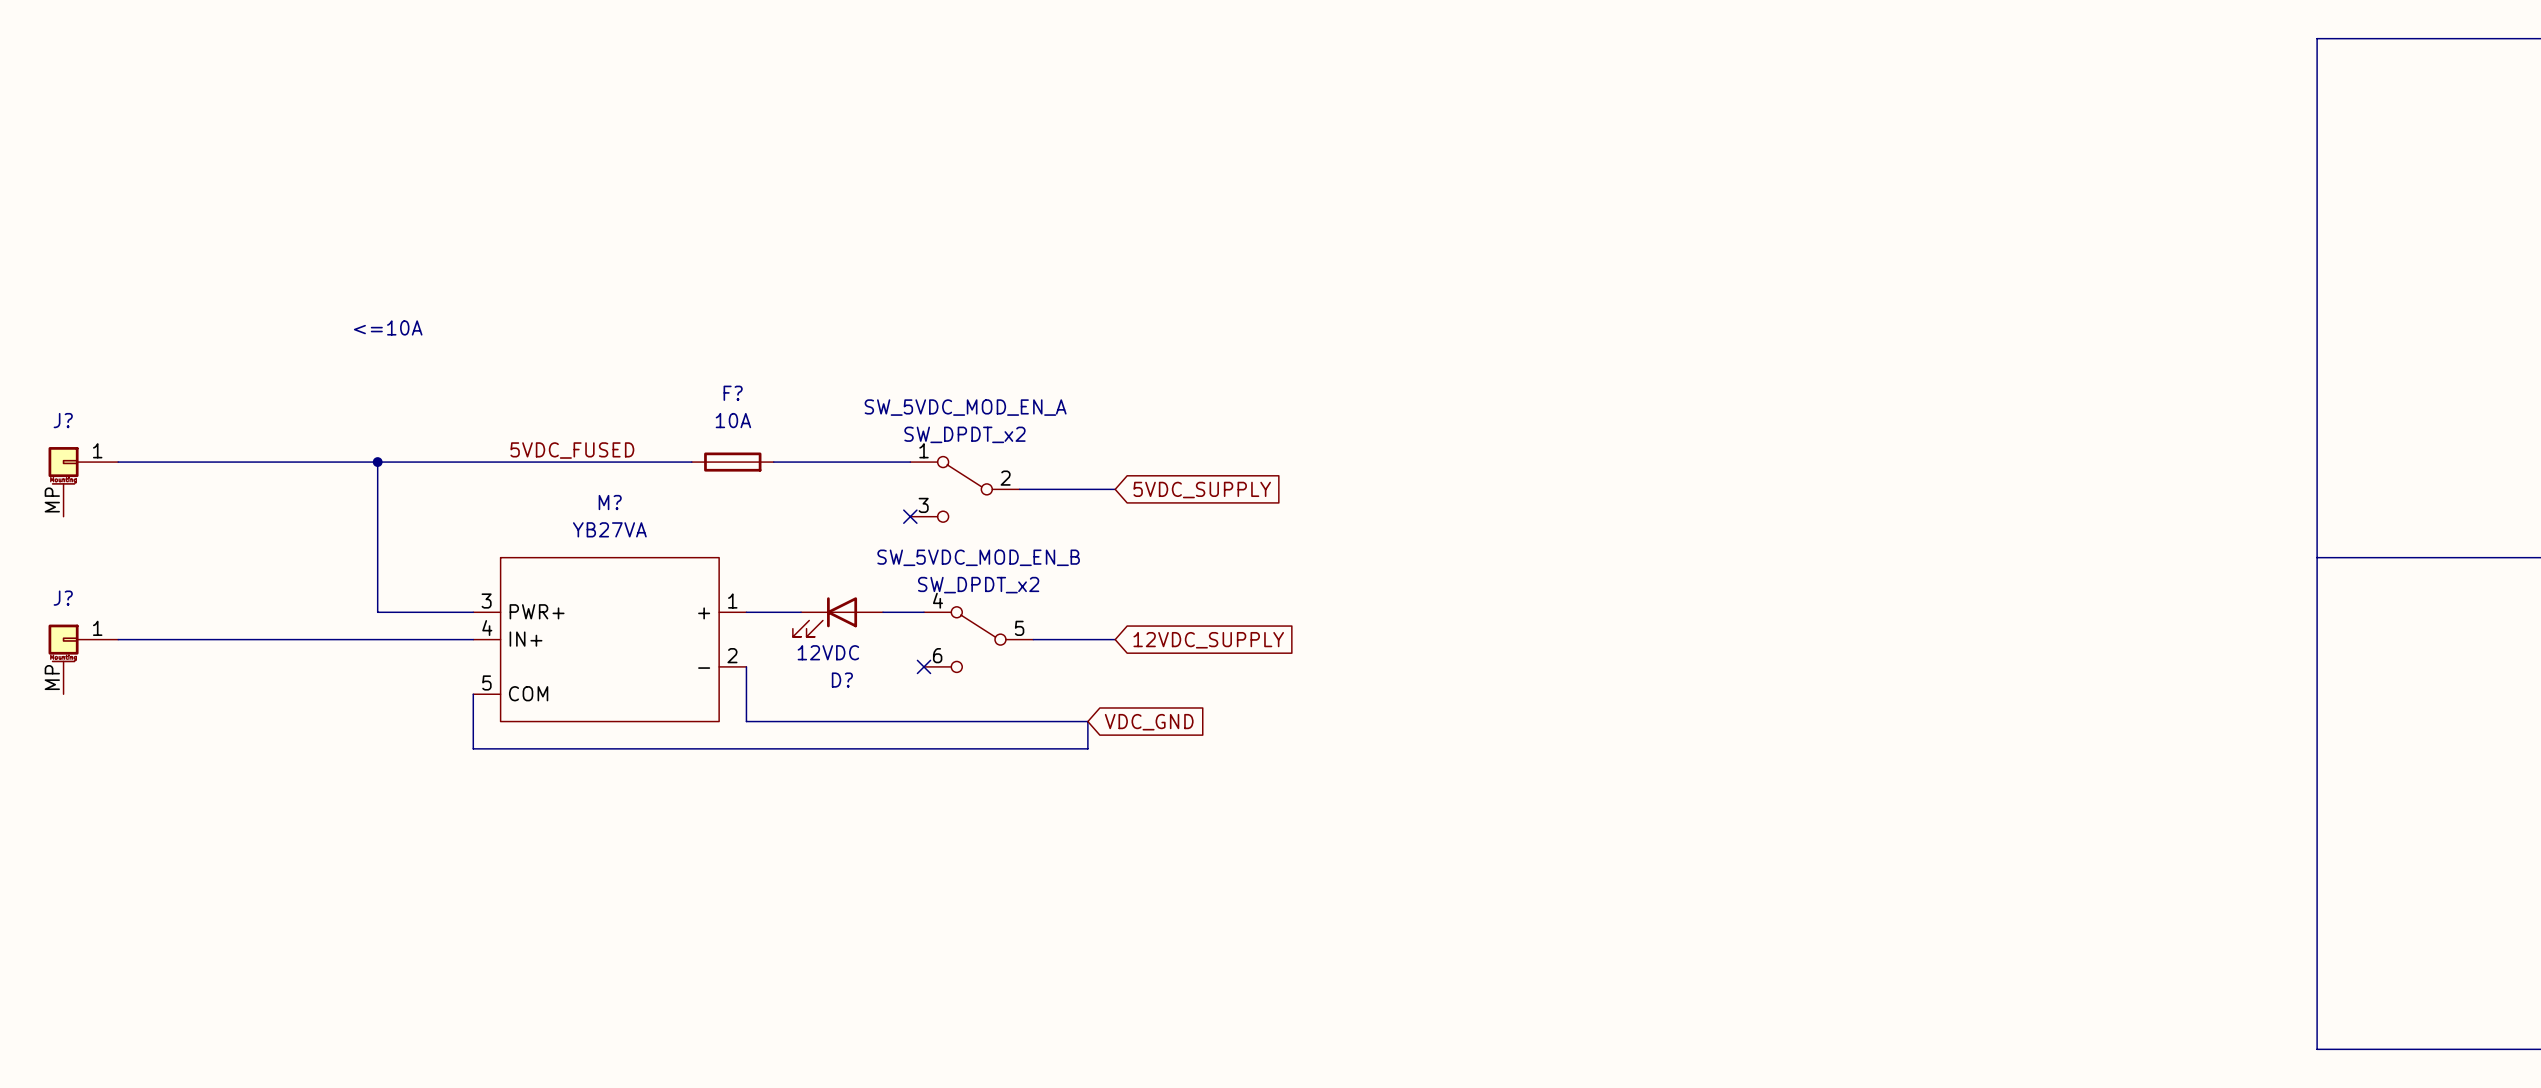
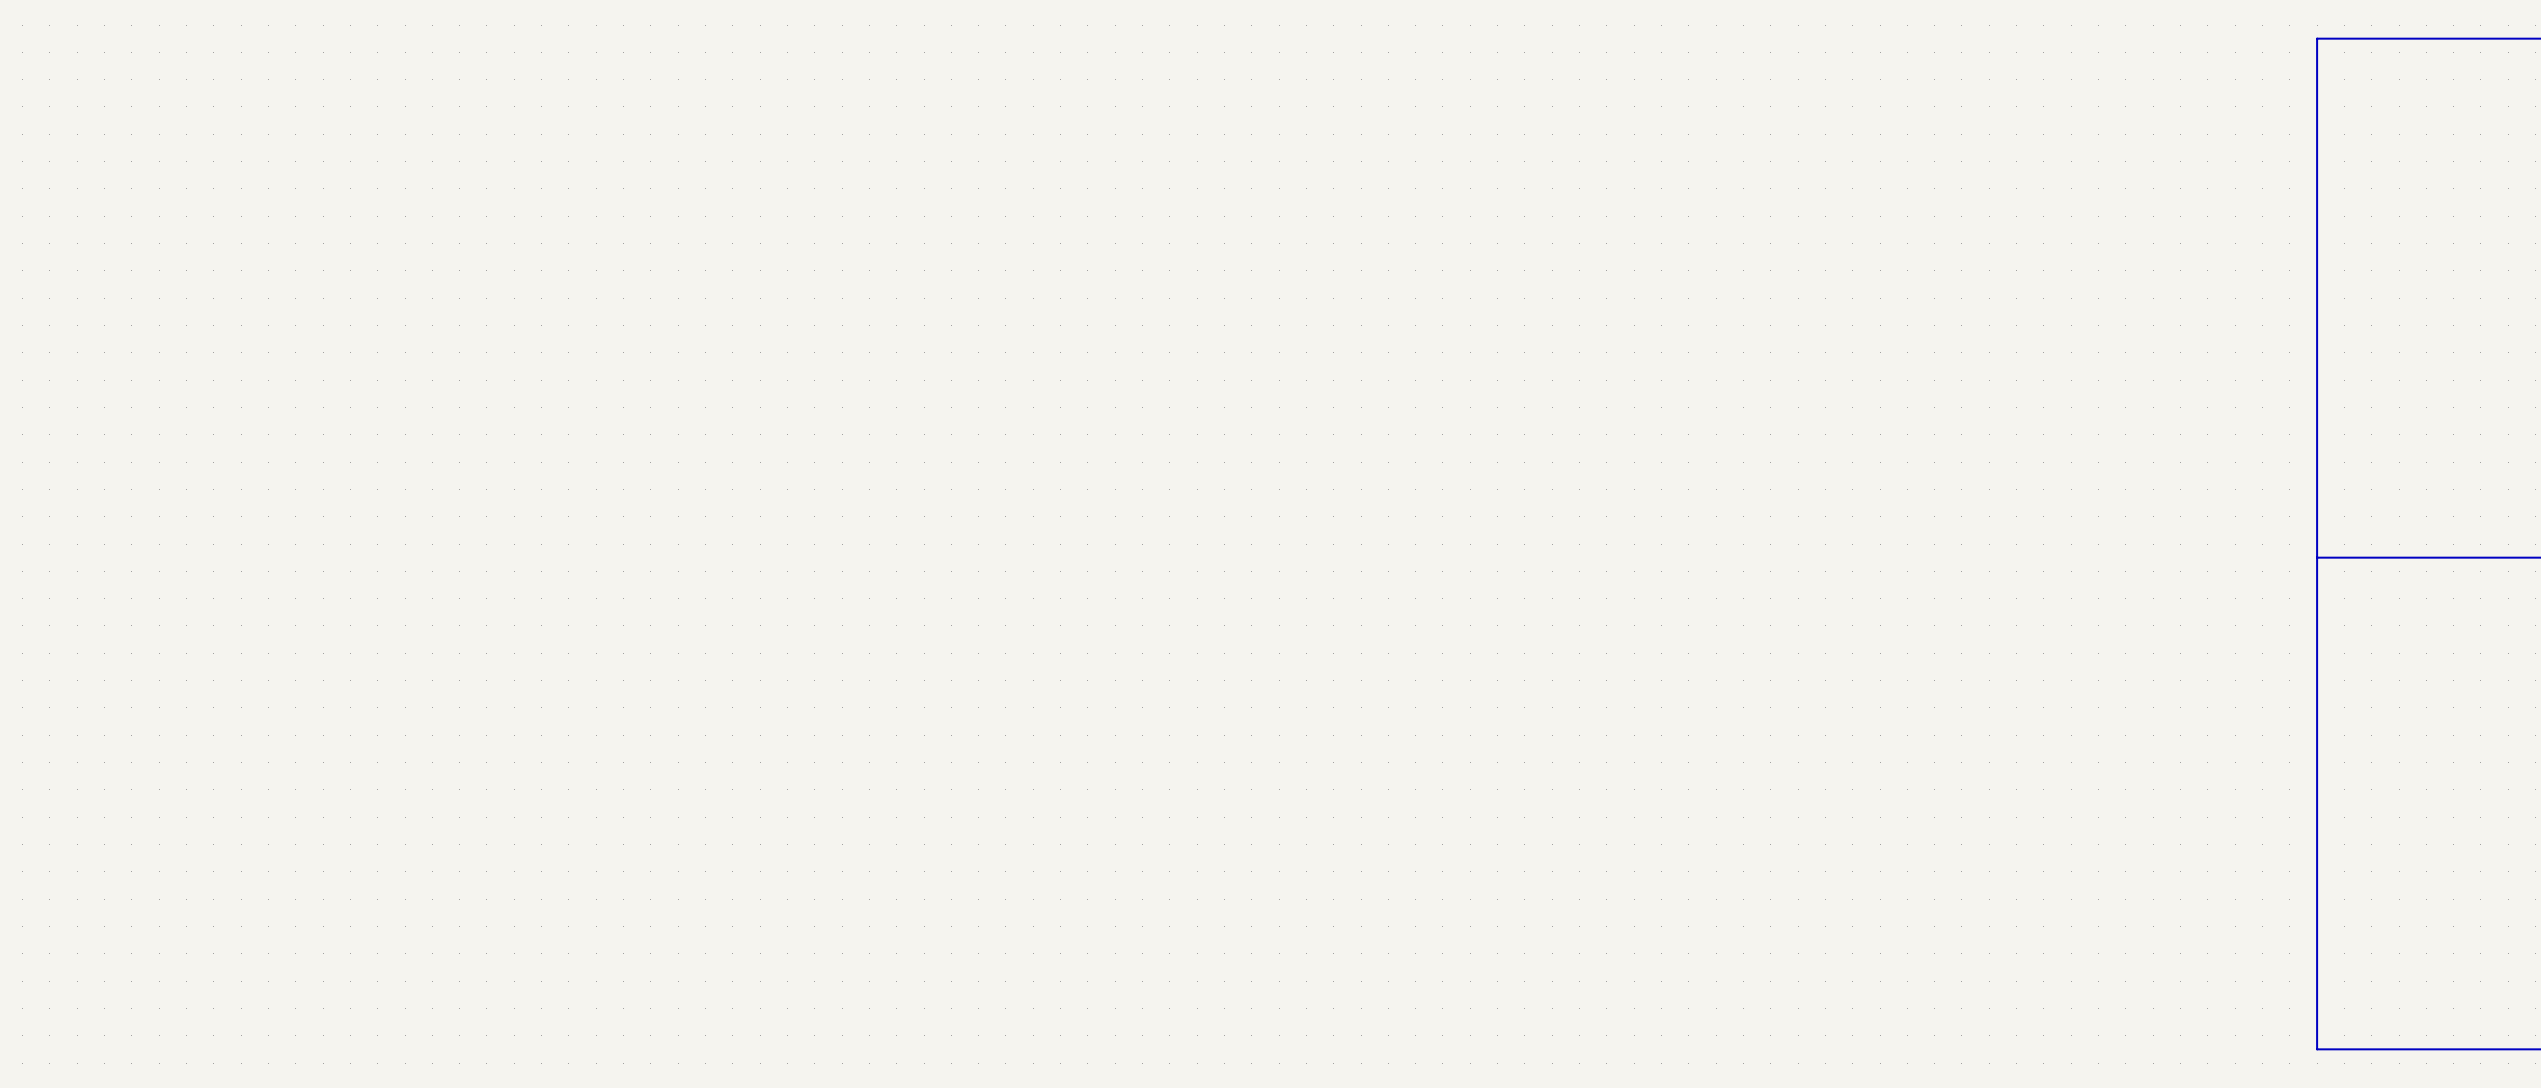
text: <=10A (388, 327) -> none
label: 5VDC_FUSED (572, 450) -> none
wire: (118, 462) (691, 462) -> none
wire: (377, 462) (377, 612) (473, 612) -> none
junction: (377, 462) -> none
F?: 10A (732, 462) -> none
wire: (773, 462) (910, 462) -> none
J?: (83, 481) -> none
SW_5VDC_MOD_EN_A: SW_DPDT_x2 (964, 489) -> none
wire: (1019, 489) (1115, 489) -> none
global label: 5VDC_SUPPLY (1202, 490) -> none
no-connect mark: (910, 516) -> none
wire: (746, 612) (801, 612) -> none
wire: (883, 612) (924, 612) -> none
D?: 12VDC (837, 617) -> none
wire: (118, 639) (473, 639) -> none
M?: YB27VA (609, 639) -> none
SW_5VDC_MOD_EN_B: SW_DPDT_x2 (978, 639) -> none
wire: (1033, 639) (1115, 639) -> none
global label: 12VDC_SUPPLY (1208, 640) -> none
J?: (83, 659) -> none
wire: (746, 666) (746, 721) (1087, 721) (1087, 748) (473, 748) (473, 694) -> none
no-connect mark: (924, 666) -> none
global label: VDC_GND (1149, 722) -> none

